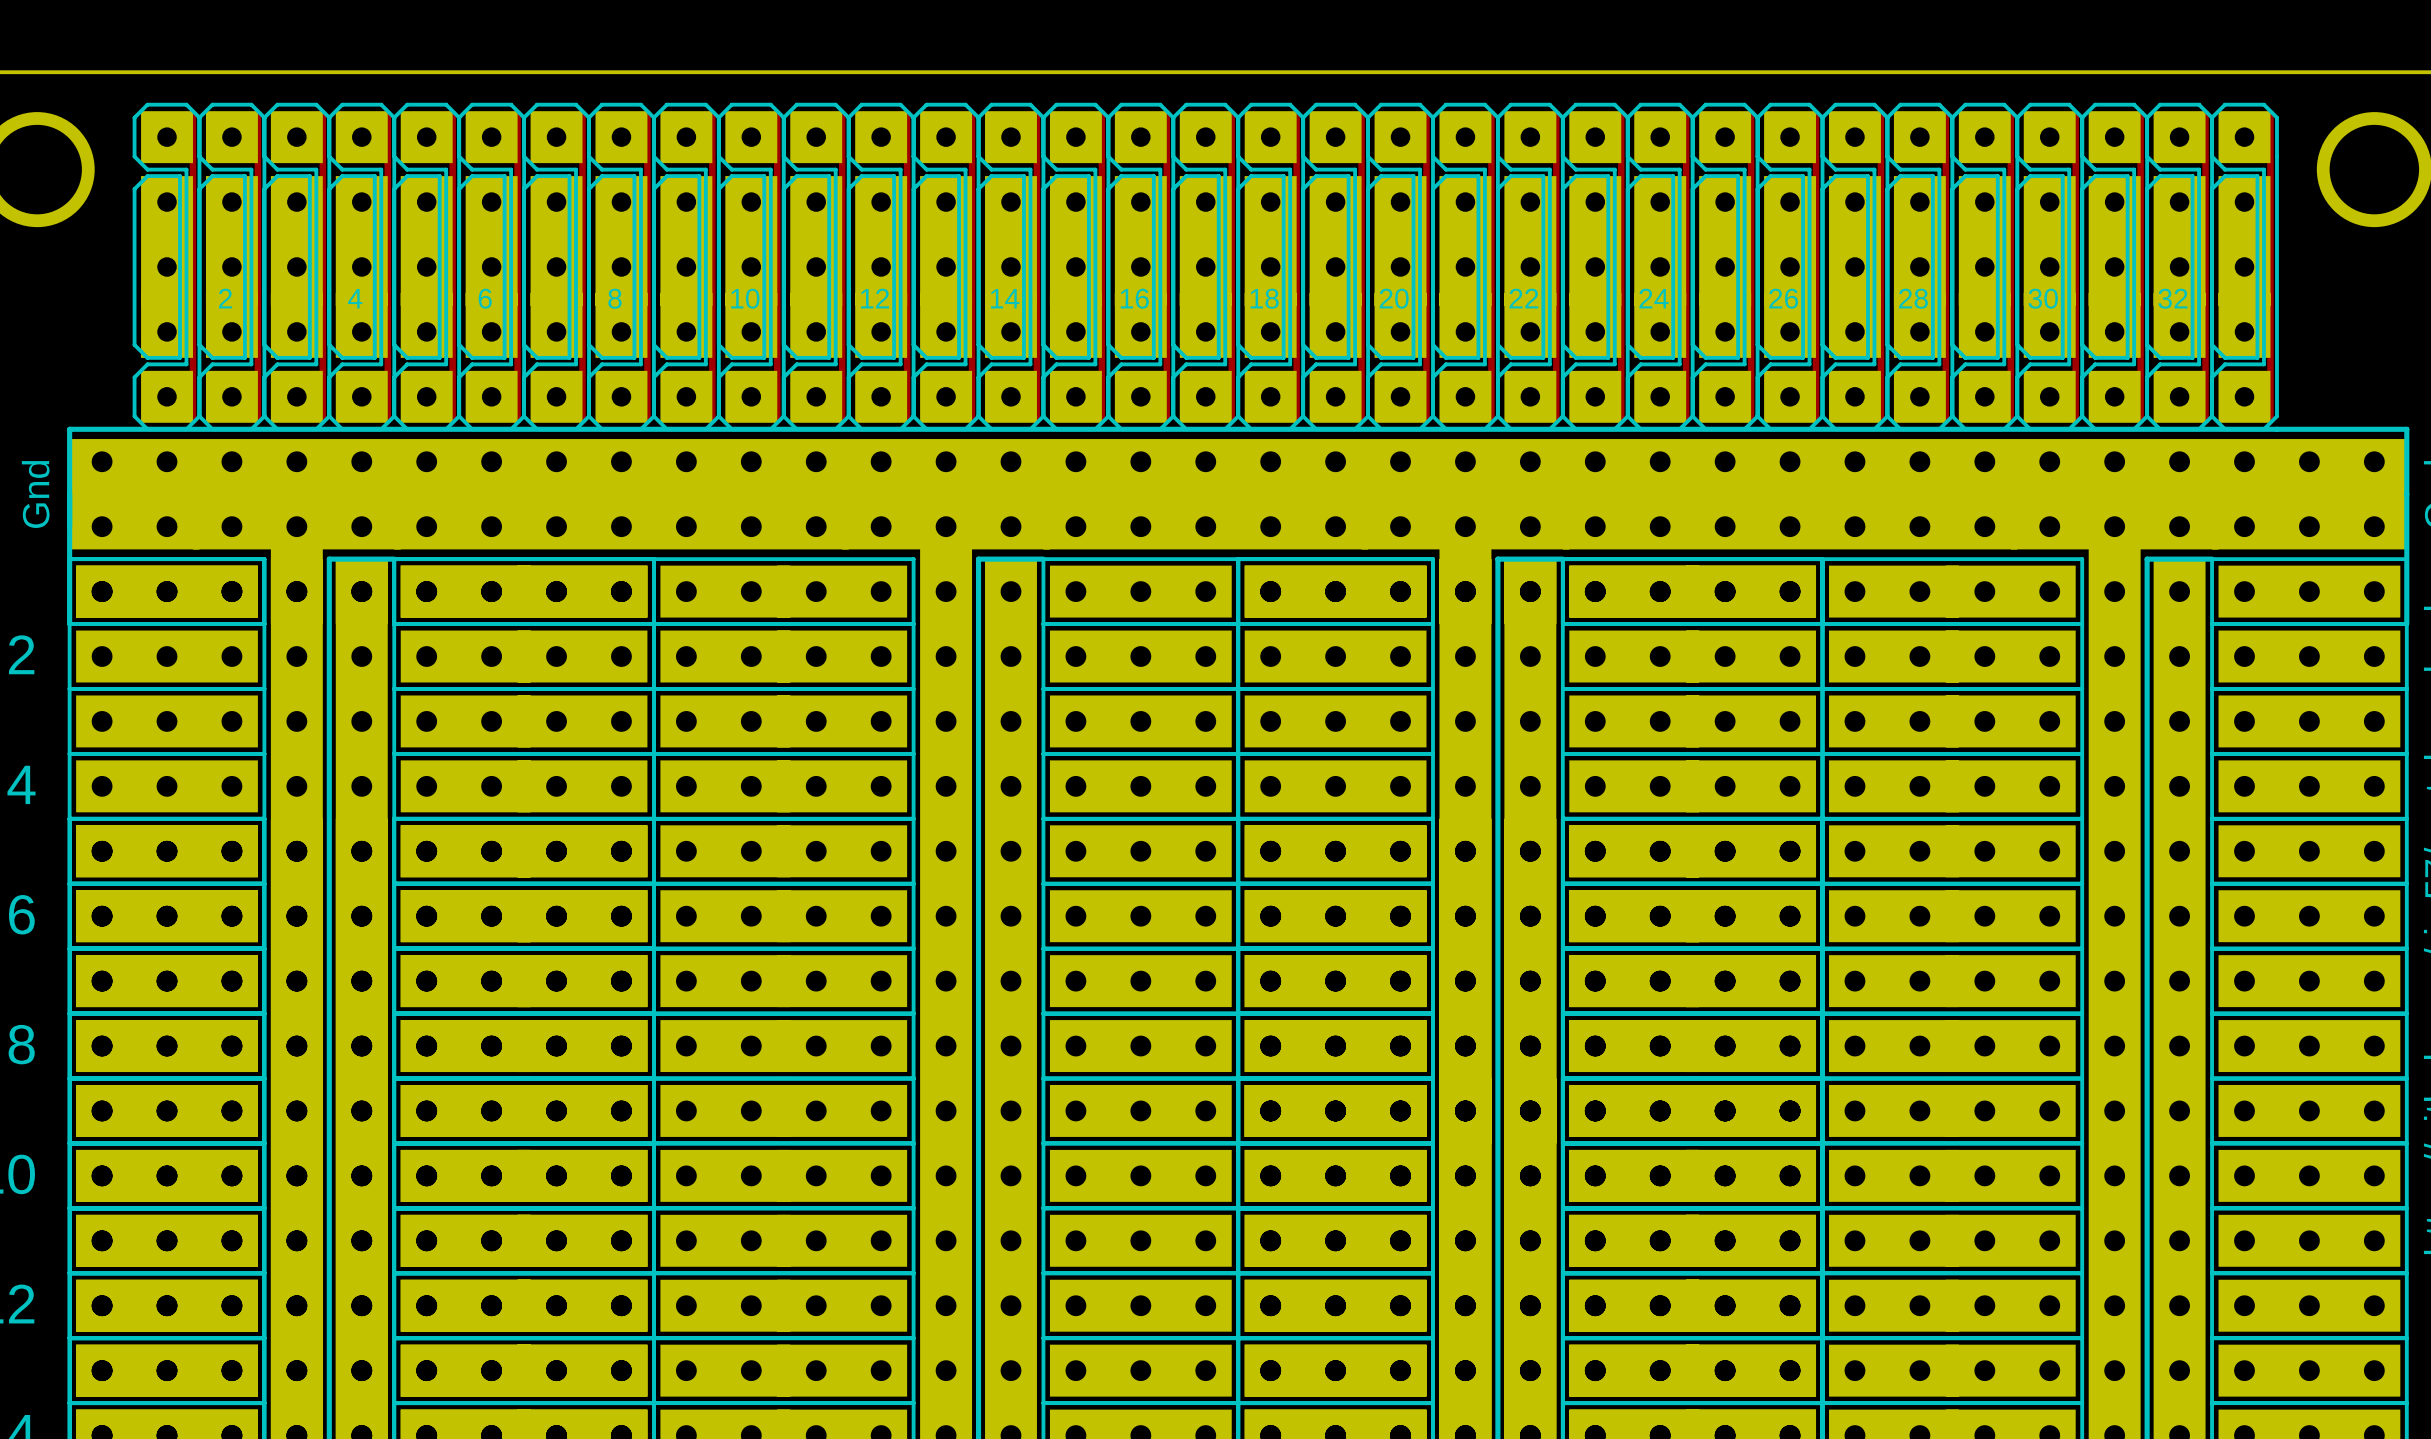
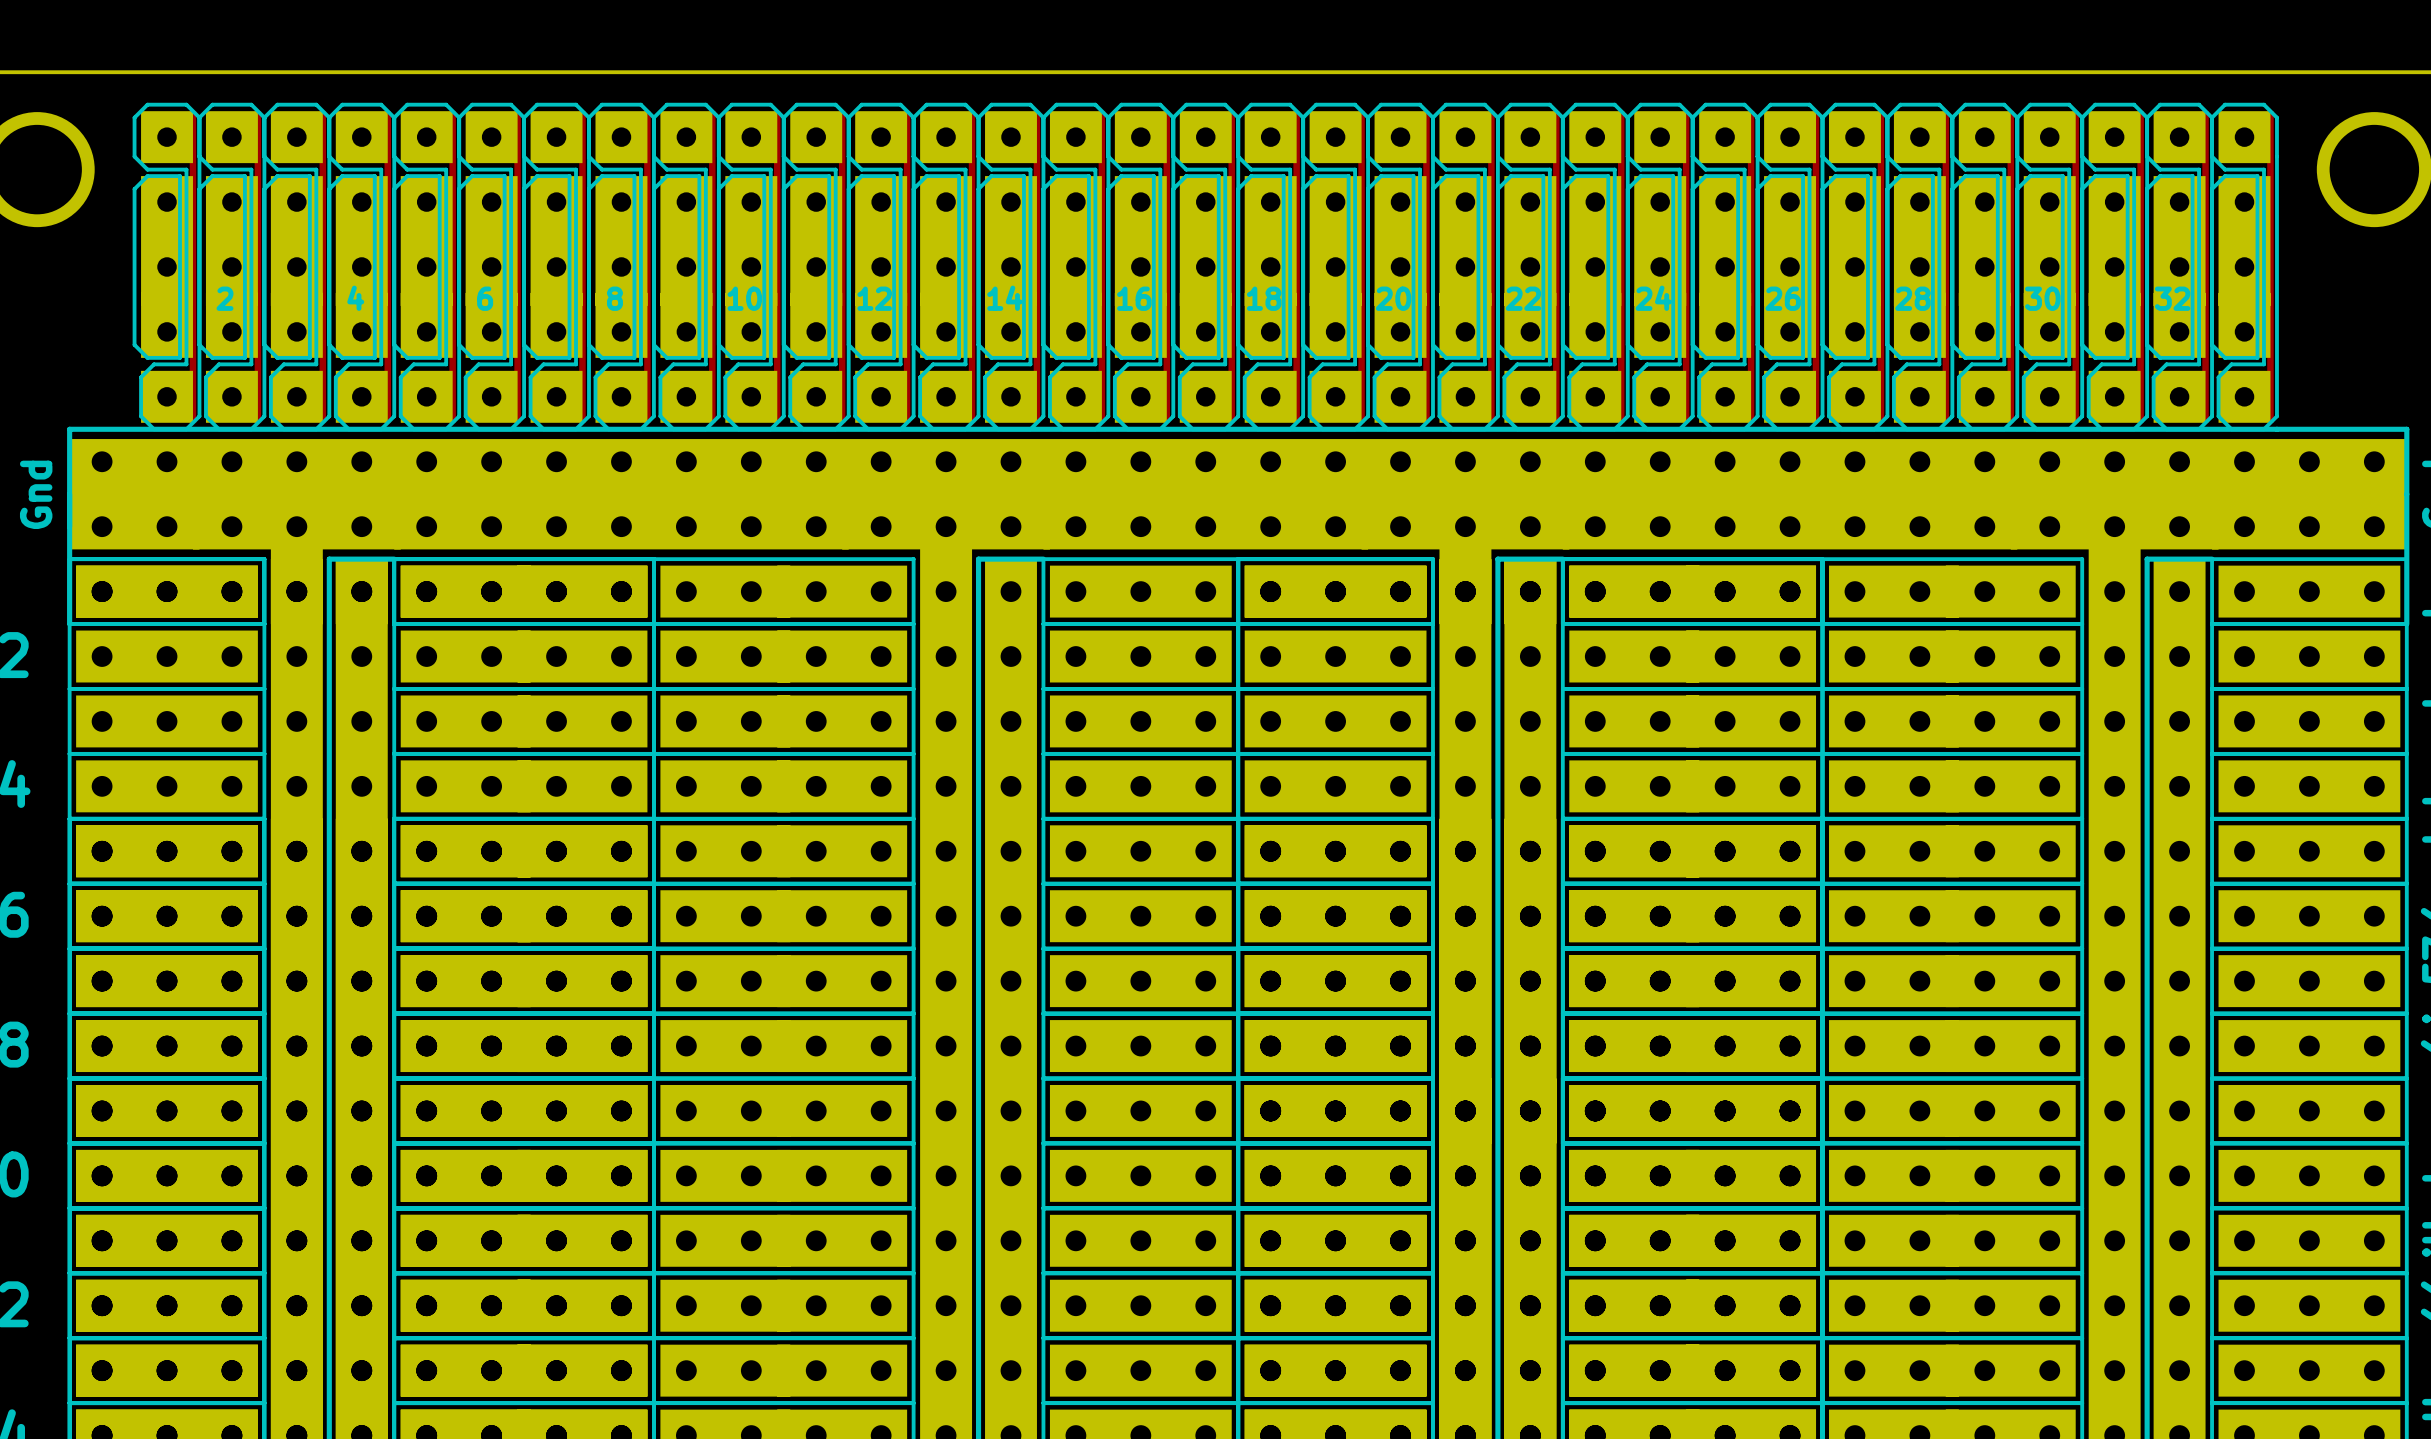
part footprint: [132, 102, 202, 432] -> [132, 102, 202, 432]
part footprint: [197, 102, 267, 432] -> [197, 102, 267, 432]
part footprint: [262, 102, 332, 432] -> [262, 102, 332, 432]
part footprint: [327, 102, 397, 432] -> [327, 102, 397, 432]
part footprint: [392, 102, 462, 432] -> [392, 102, 462, 432]
part footprint: [457, 102, 527, 432] -> [457, 102, 527, 432]
part footprint: [522, 102, 591, 432] -> [522, 102, 591, 432]
part footprint: [587, 102, 656, 432] -> [587, 102, 656, 432]
part footprint: [652, 102, 721, 432] -> [652, 102, 721, 432]
part footprint: [716, 102, 786, 432] -> [716, 102, 786, 432]
part footprint: [781, 102, 851, 432] -> [781, 102, 851, 432]
part footprint: [846, 102, 916, 432] -> [846, 102, 916, 432]
part footprint: [911, 102, 981, 432] -> [911, 102, 981, 432]
part footprint: [976, 102, 1046, 432] -> [976, 102, 1046, 432]
part footprint: [1041, 102, 1111, 432] -> [1041, 102, 1111, 432]
part footprint: [1106, 102, 1176, 432] -> [1106, 102, 1176, 432]
part footprint: [1171, 102, 1241, 432] -> [1171, 102, 1241, 432]
part footprint: [1236, 102, 1306, 432] -> [1236, 102, 1306, 432]
part footprint: [1301, 102, 1370, 432] -> [1301, 102, 1370, 432]
part footprint: [1366, 102, 1435, 432] -> [1366, 102, 1435, 432]
part footprint: [1431, 102, 1500, 432] -> [1431, 102, 1500, 432]
part footprint: [1495, 102, 1565, 432] -> [1495, 102, 1565, 432]
part footprint: [1560, 102, 1630, 432] -> [1560, 102, 1630, 432]
part footprint: [1625, 102, 1695, 432] -> [1625, 102, 1695, 432]
part footprint: [1690, 102, 1760, 432] -> [1690, 102, 1760, 432]
part footprint: [1755, 102, 1825, 432] -> [1755, 102, 1825, 432]
part footprint: [1820, 102, 1890, 432] -> [1820, 102, 1890, 432]
part footprint: [1885, 102, 1955, 432] -> [1885, 102, 1955, 432]
part footprint: [1950, 102, 2020, 432] -> [1950, 102, 2020, 432]
part footprint: [2015, 102, 2085, 432] -> [2015, 102, 2085, 432]
part footprint: [2080, 102, 2150, 432] -> [2080, 102, 2150, 432]
part footprint: [2145, 102, 2214, 432] -> [2145, 102, 2214, 432]
part footprint: [2210, 102, 2279, 432] -> [2210, 102, 2279, 432]

